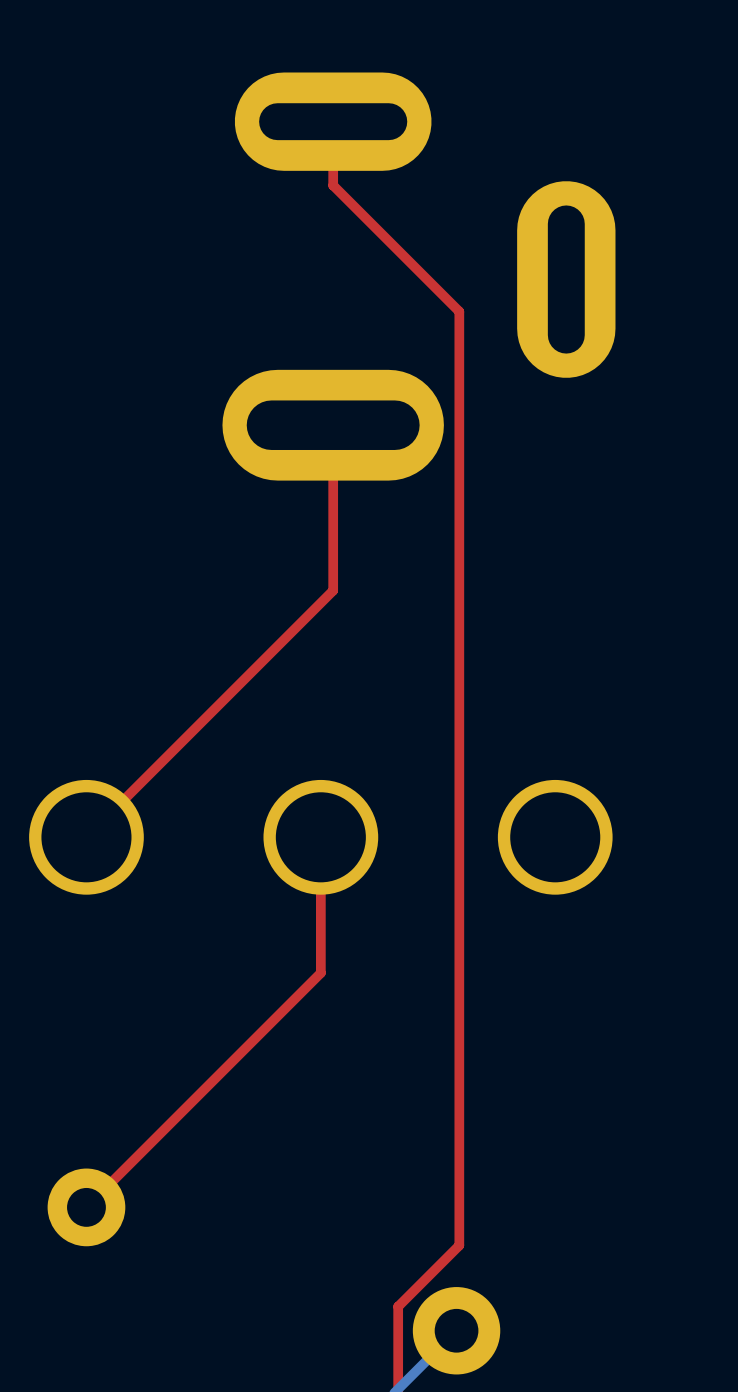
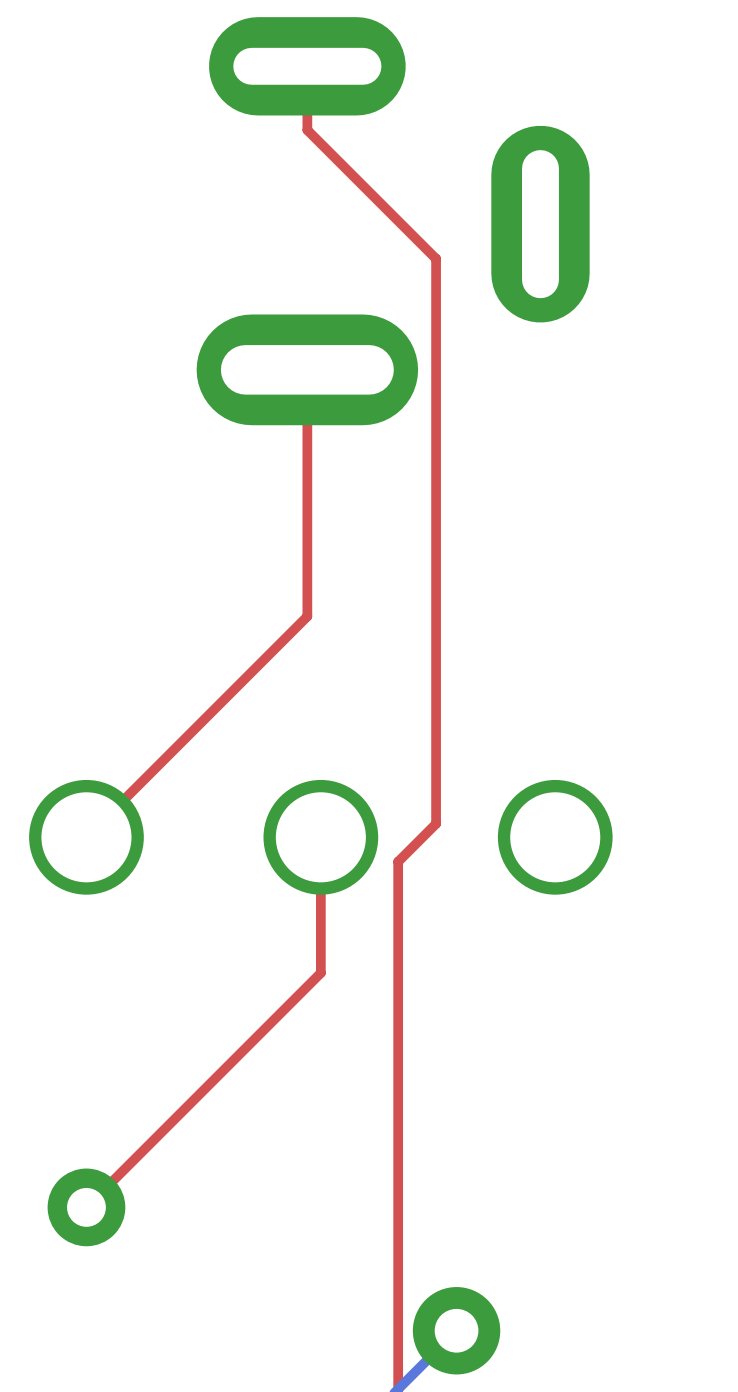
top track: (333, 121) (333, 185) (459, 311) (459, 1245) (398, 1306) -> (307, 66) (307, 130) (436, 258) (436, 823) (398, 861) (398, 1306)
part position: (418, 276) -> (393, 221)
top track: (333, 425) (333, 590) (307, 616) -> (307, 369) (307, 616)

